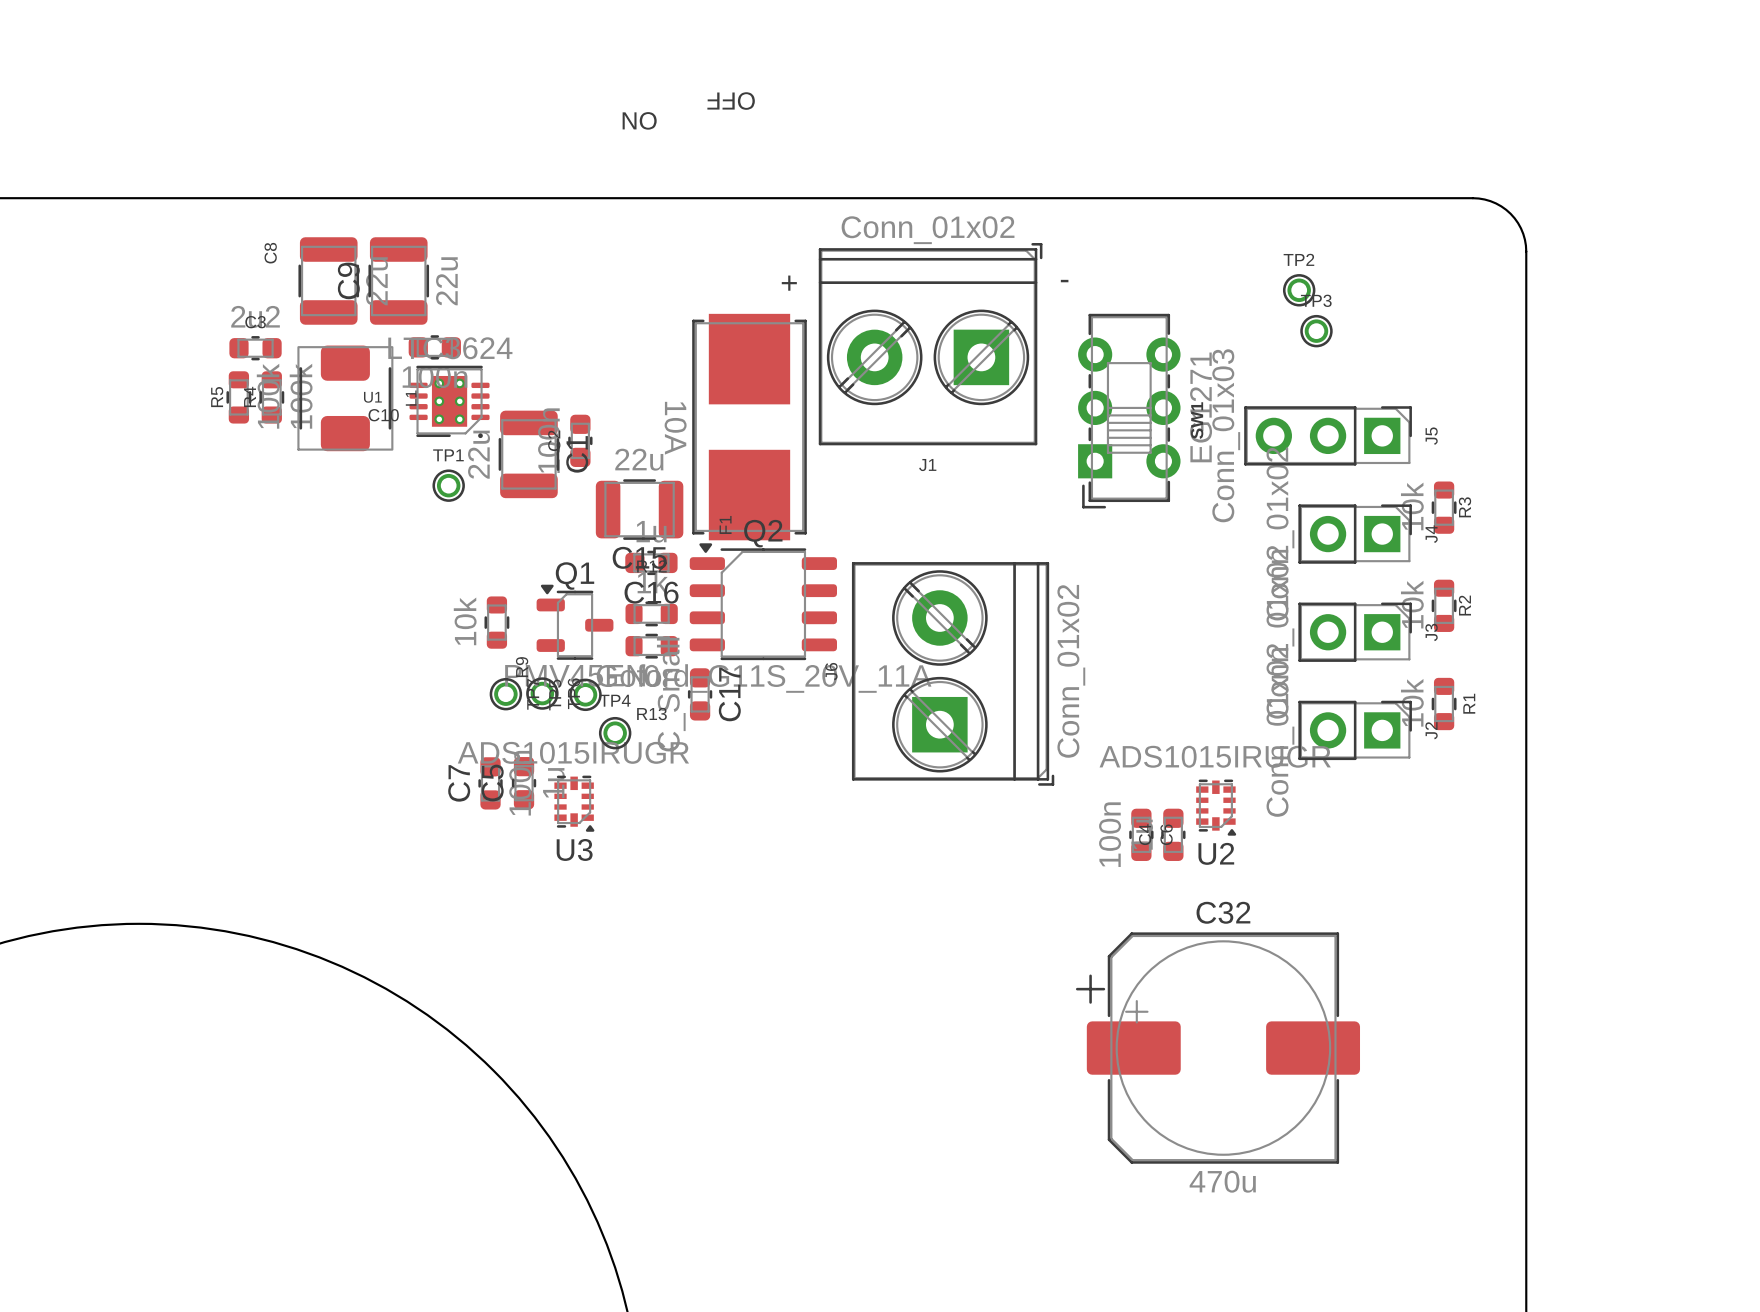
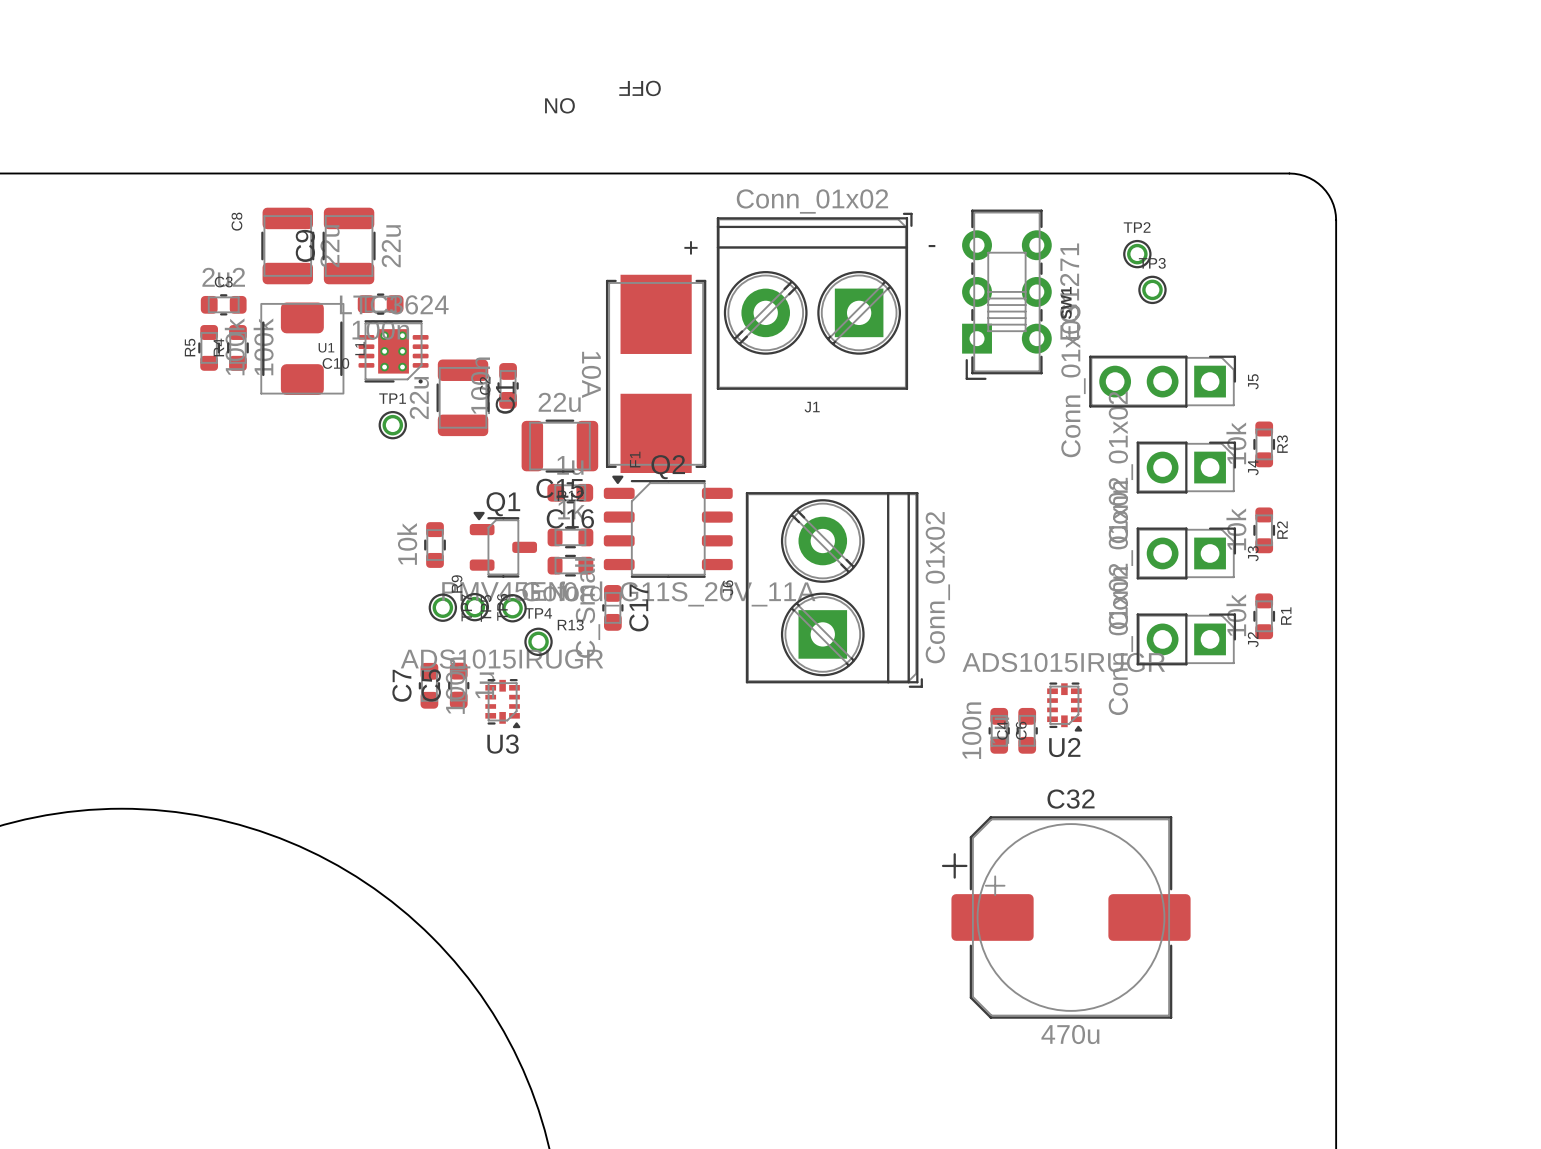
SW1 position: (1129, 411) -> (1006, 294)

